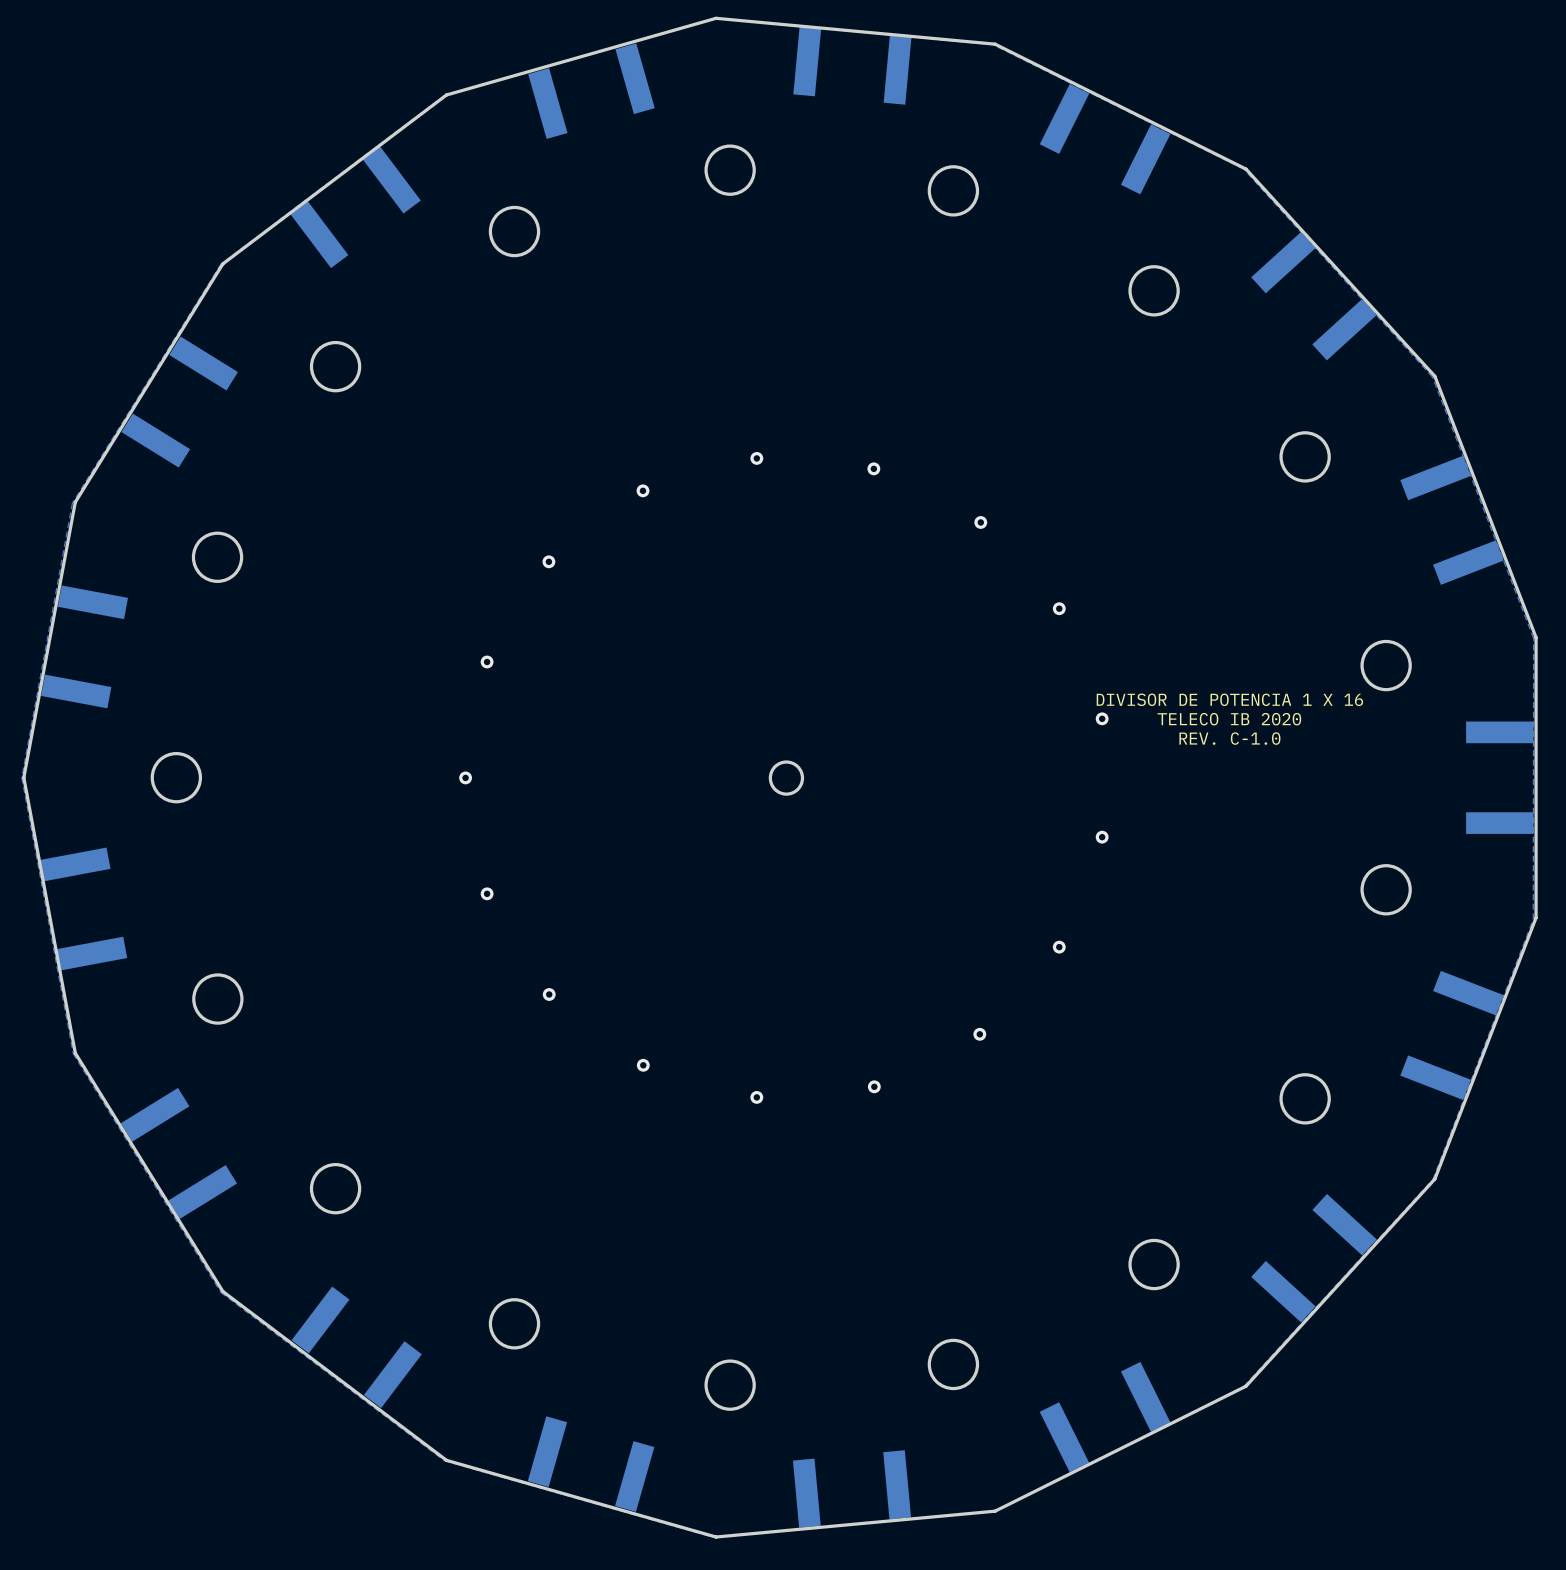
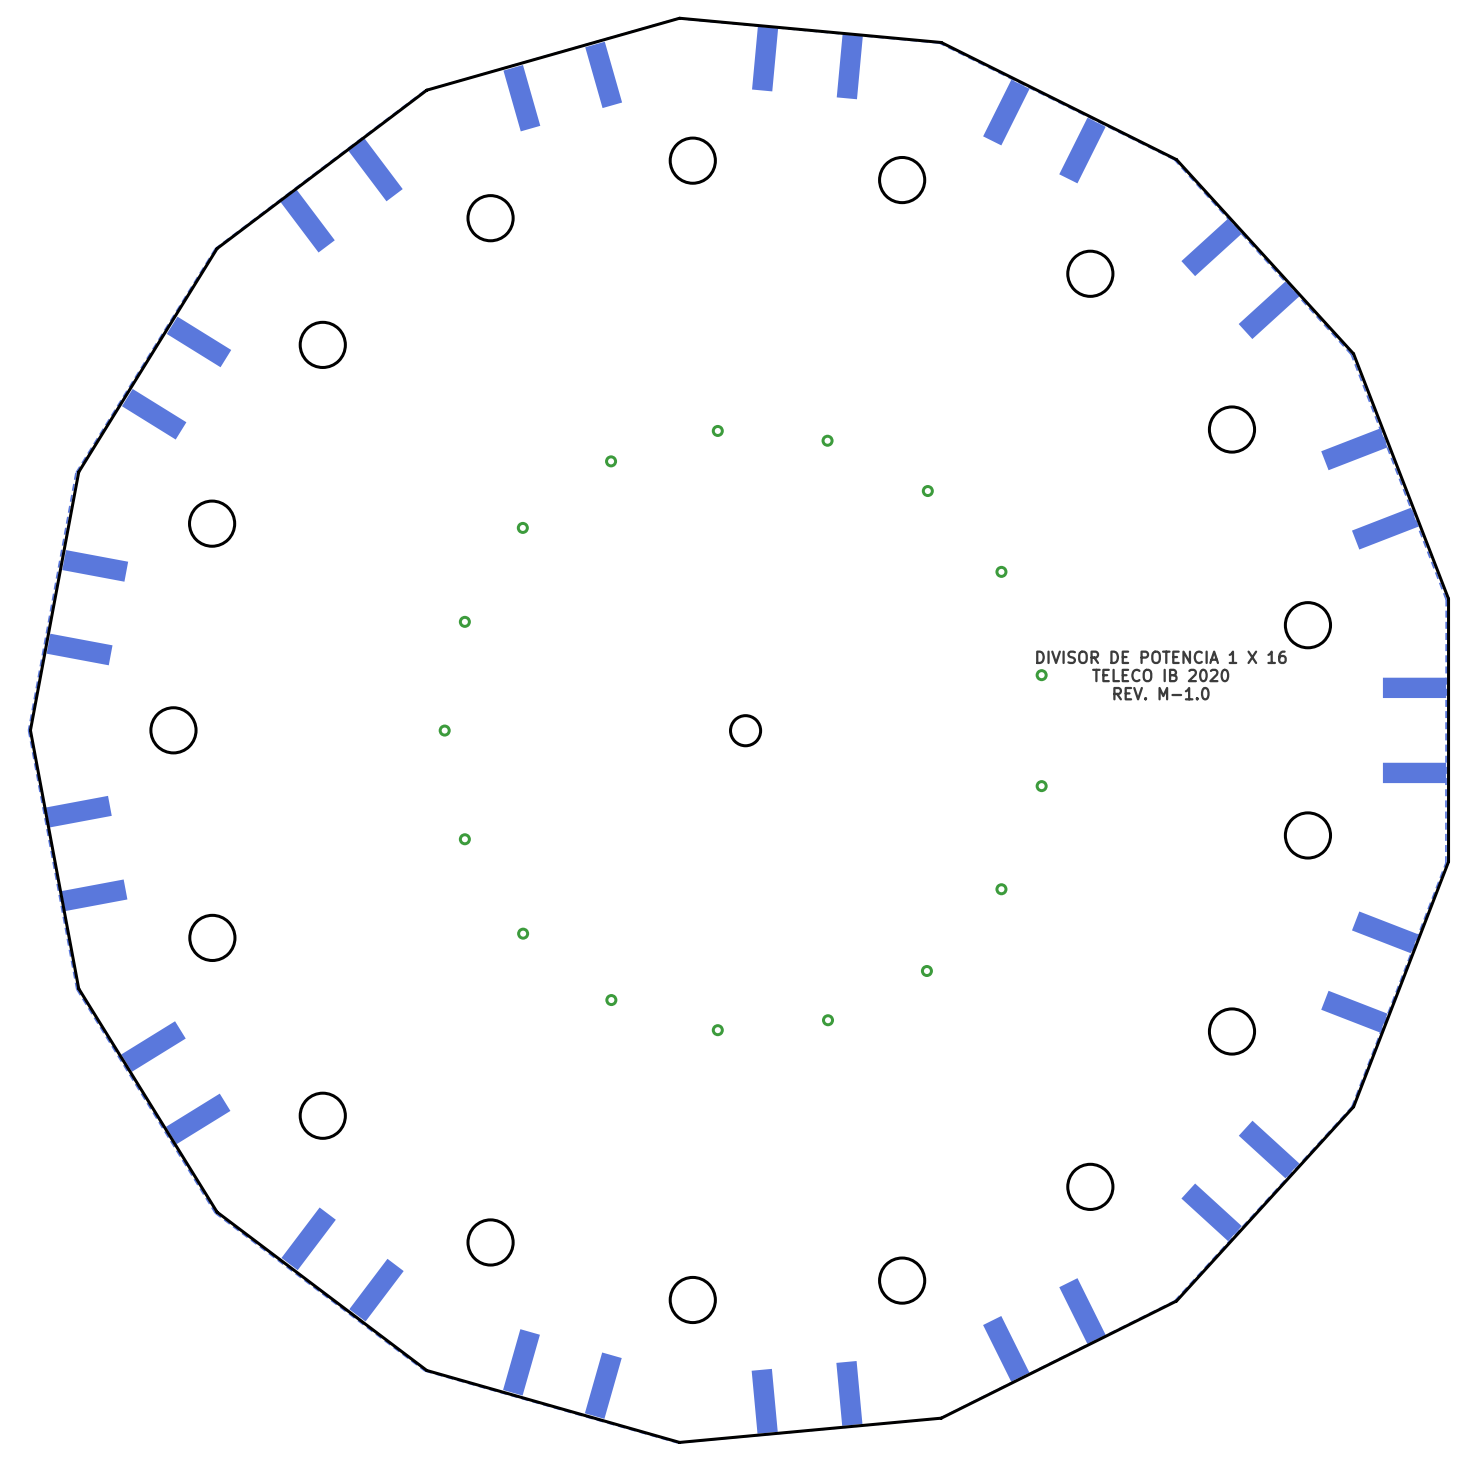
text: REV. C-1.0 (1229, 738) -> REV. M-1.0 (1161, 693)

